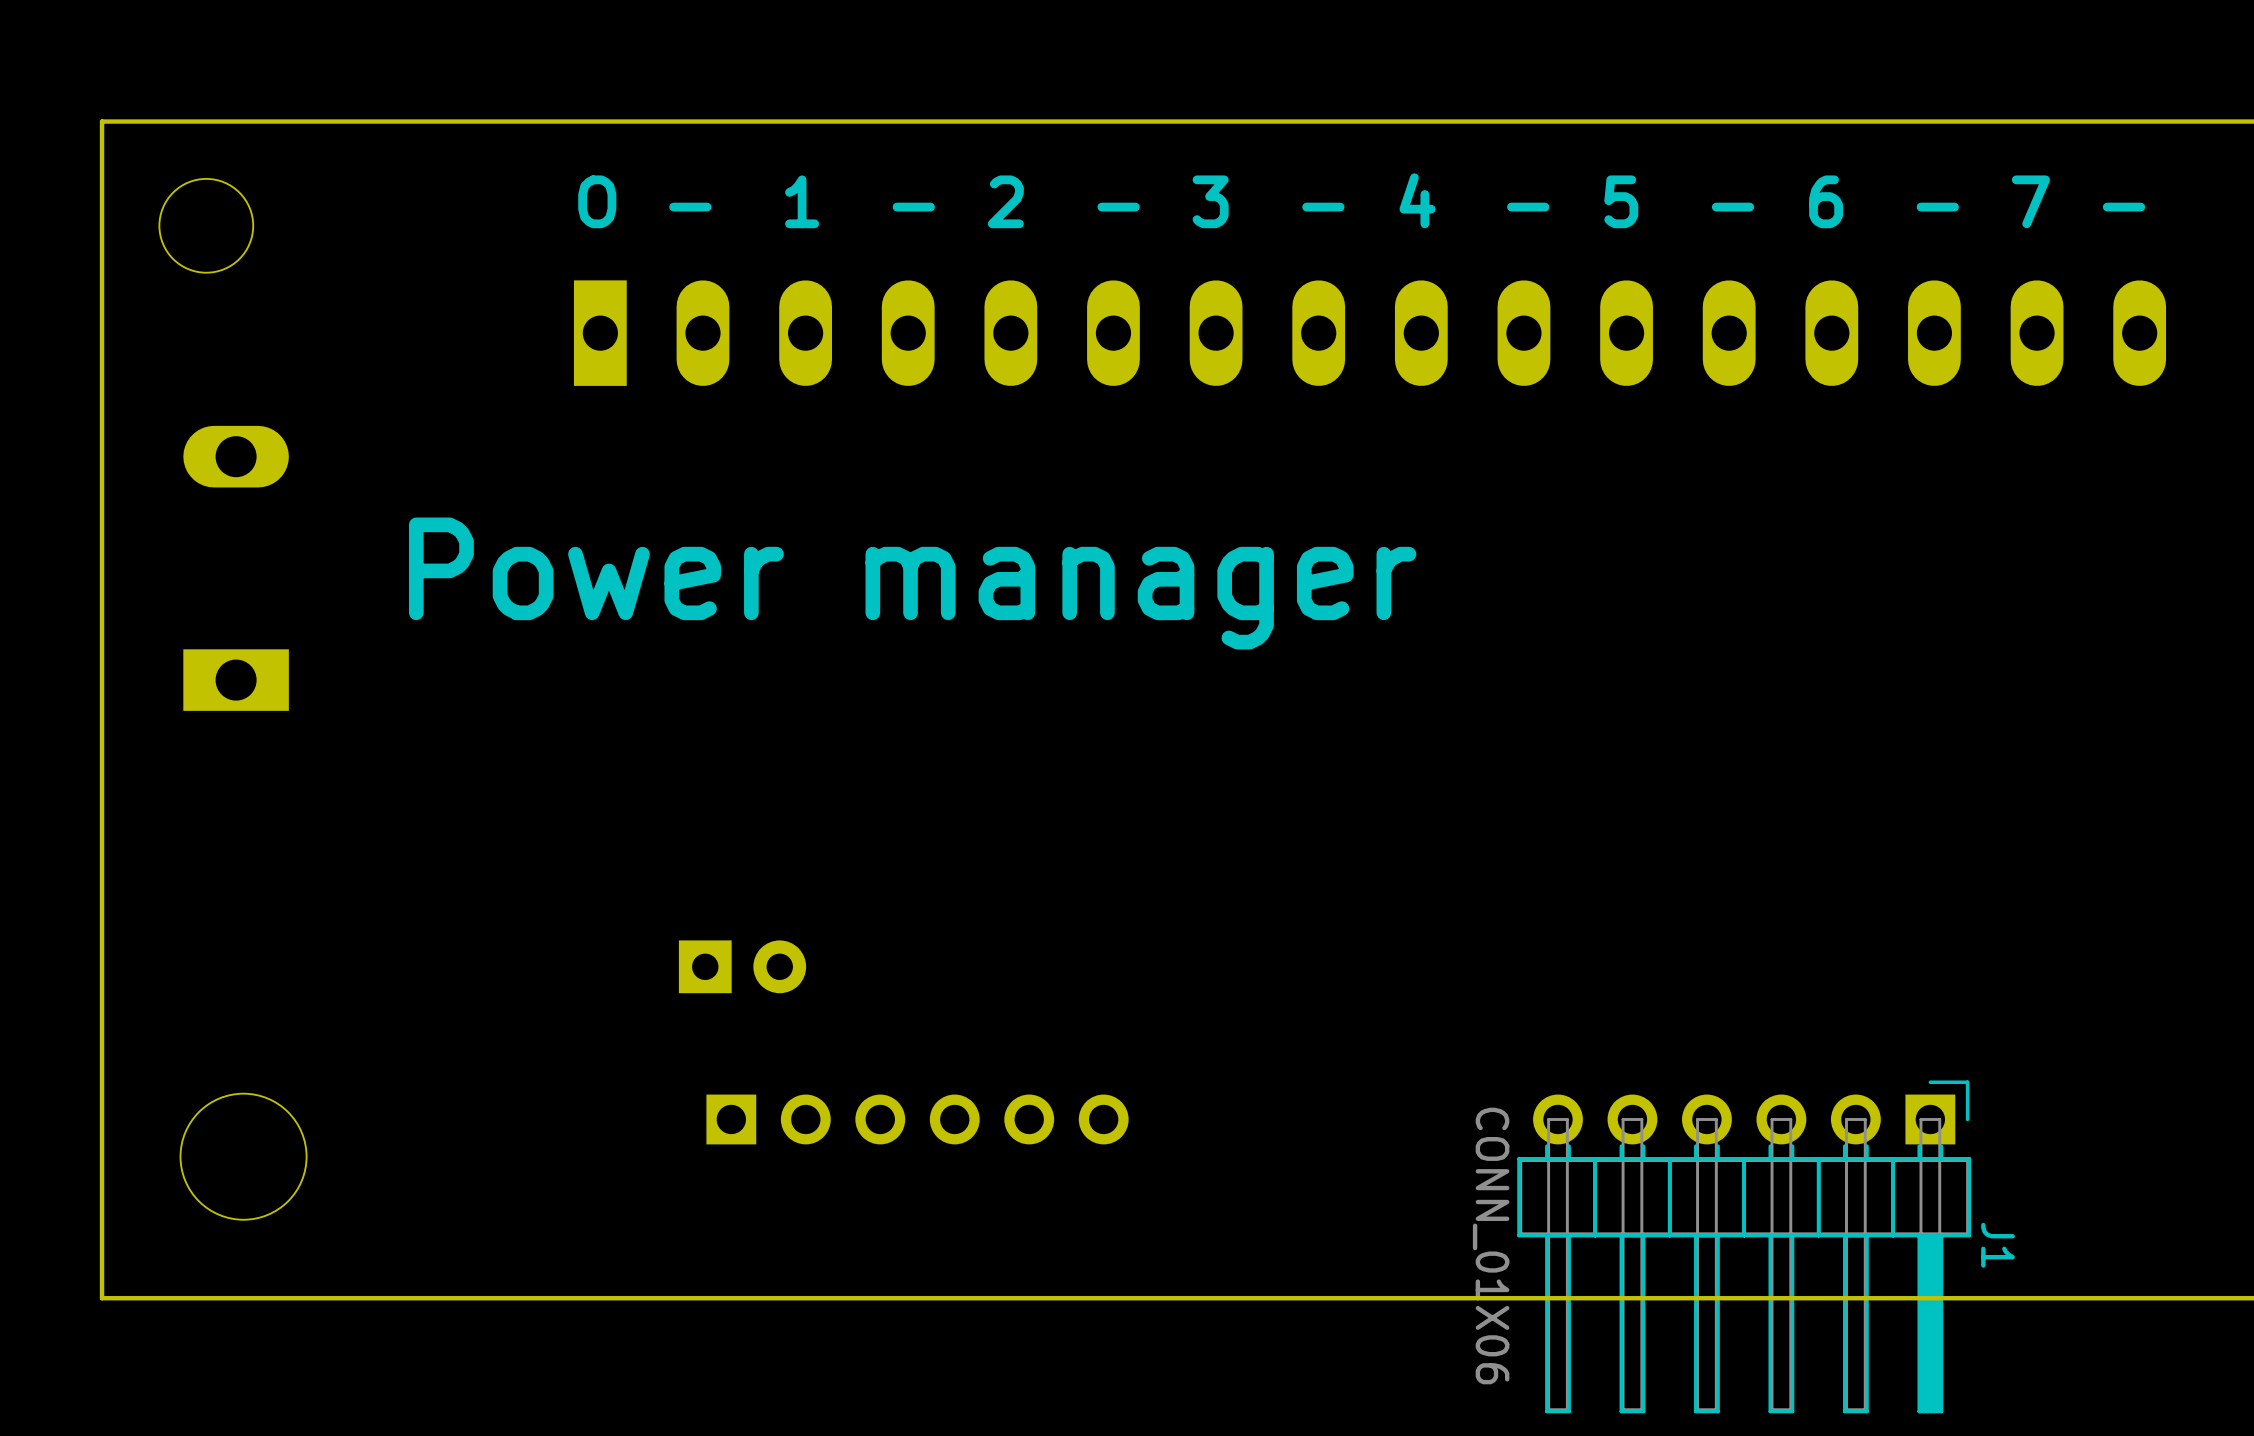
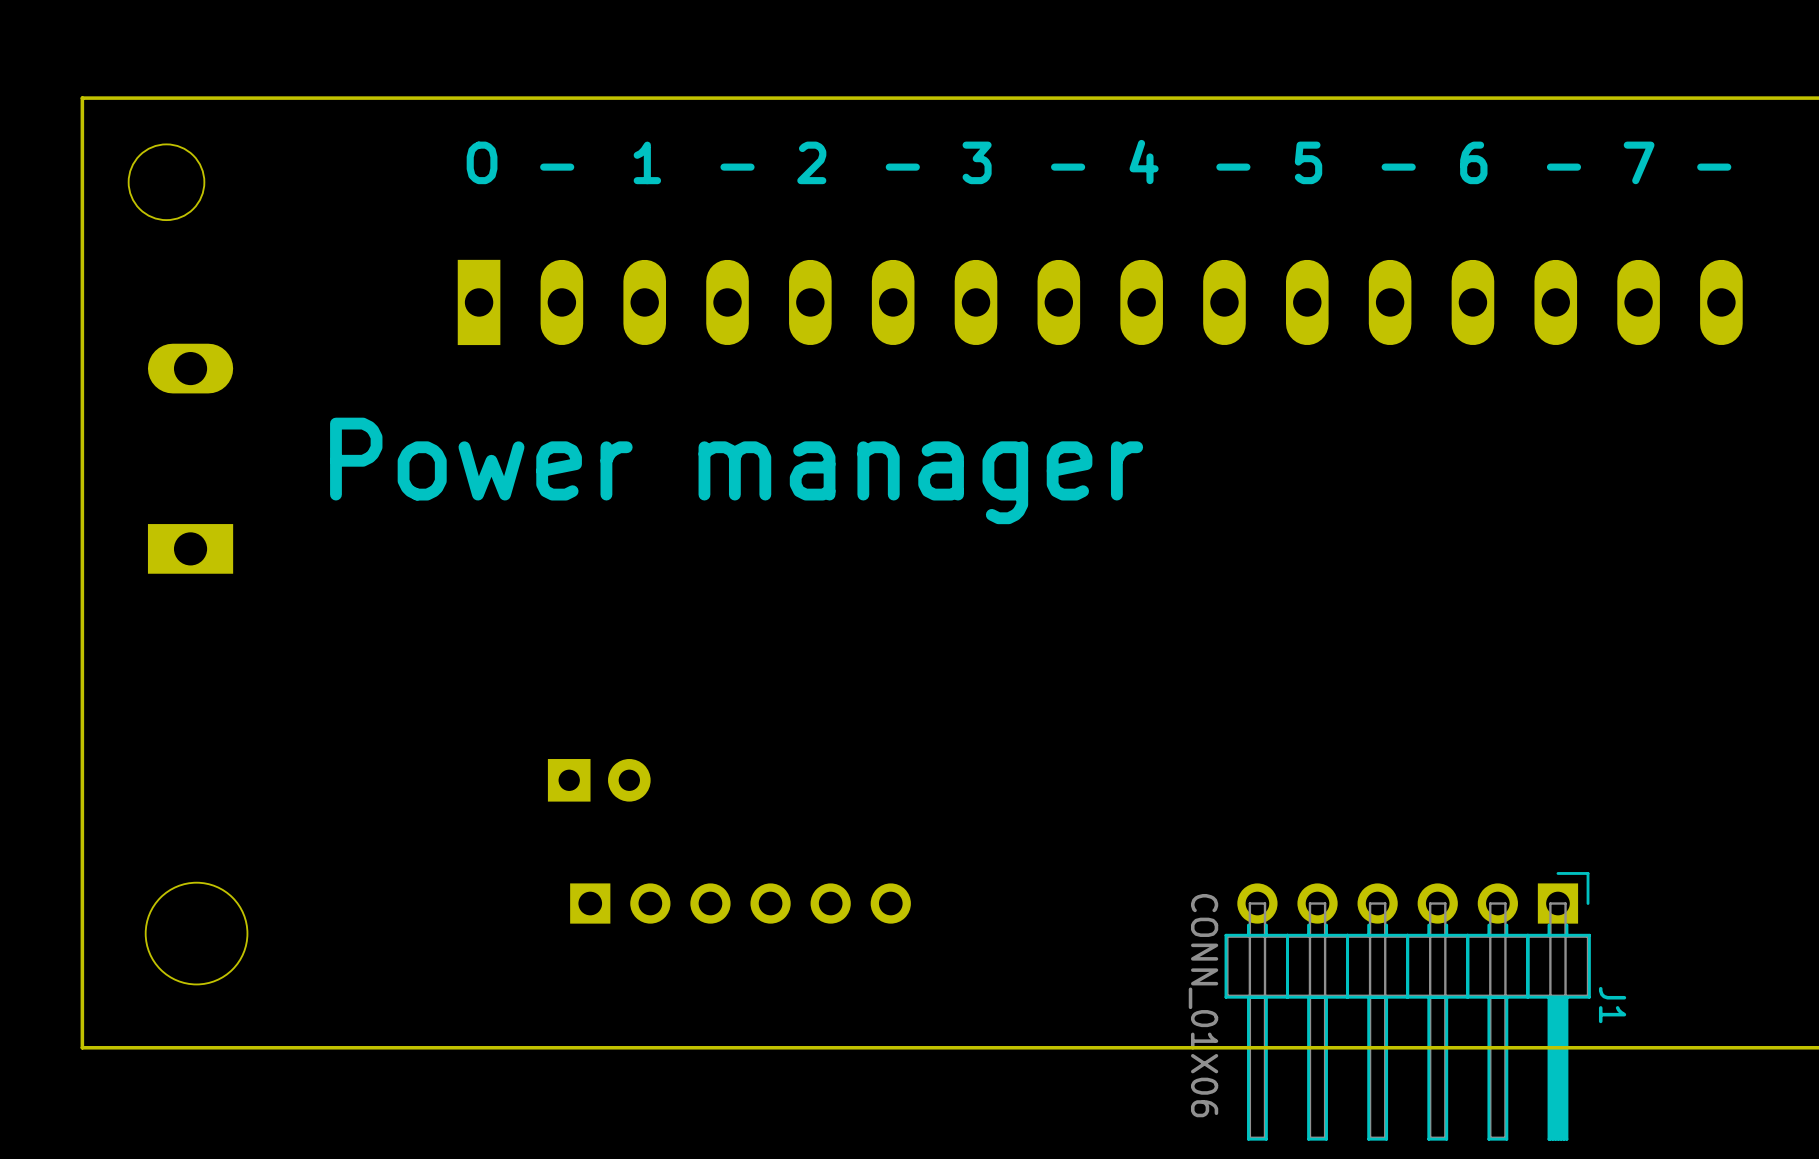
part position: (1370, 333) -> (1100, 302)

